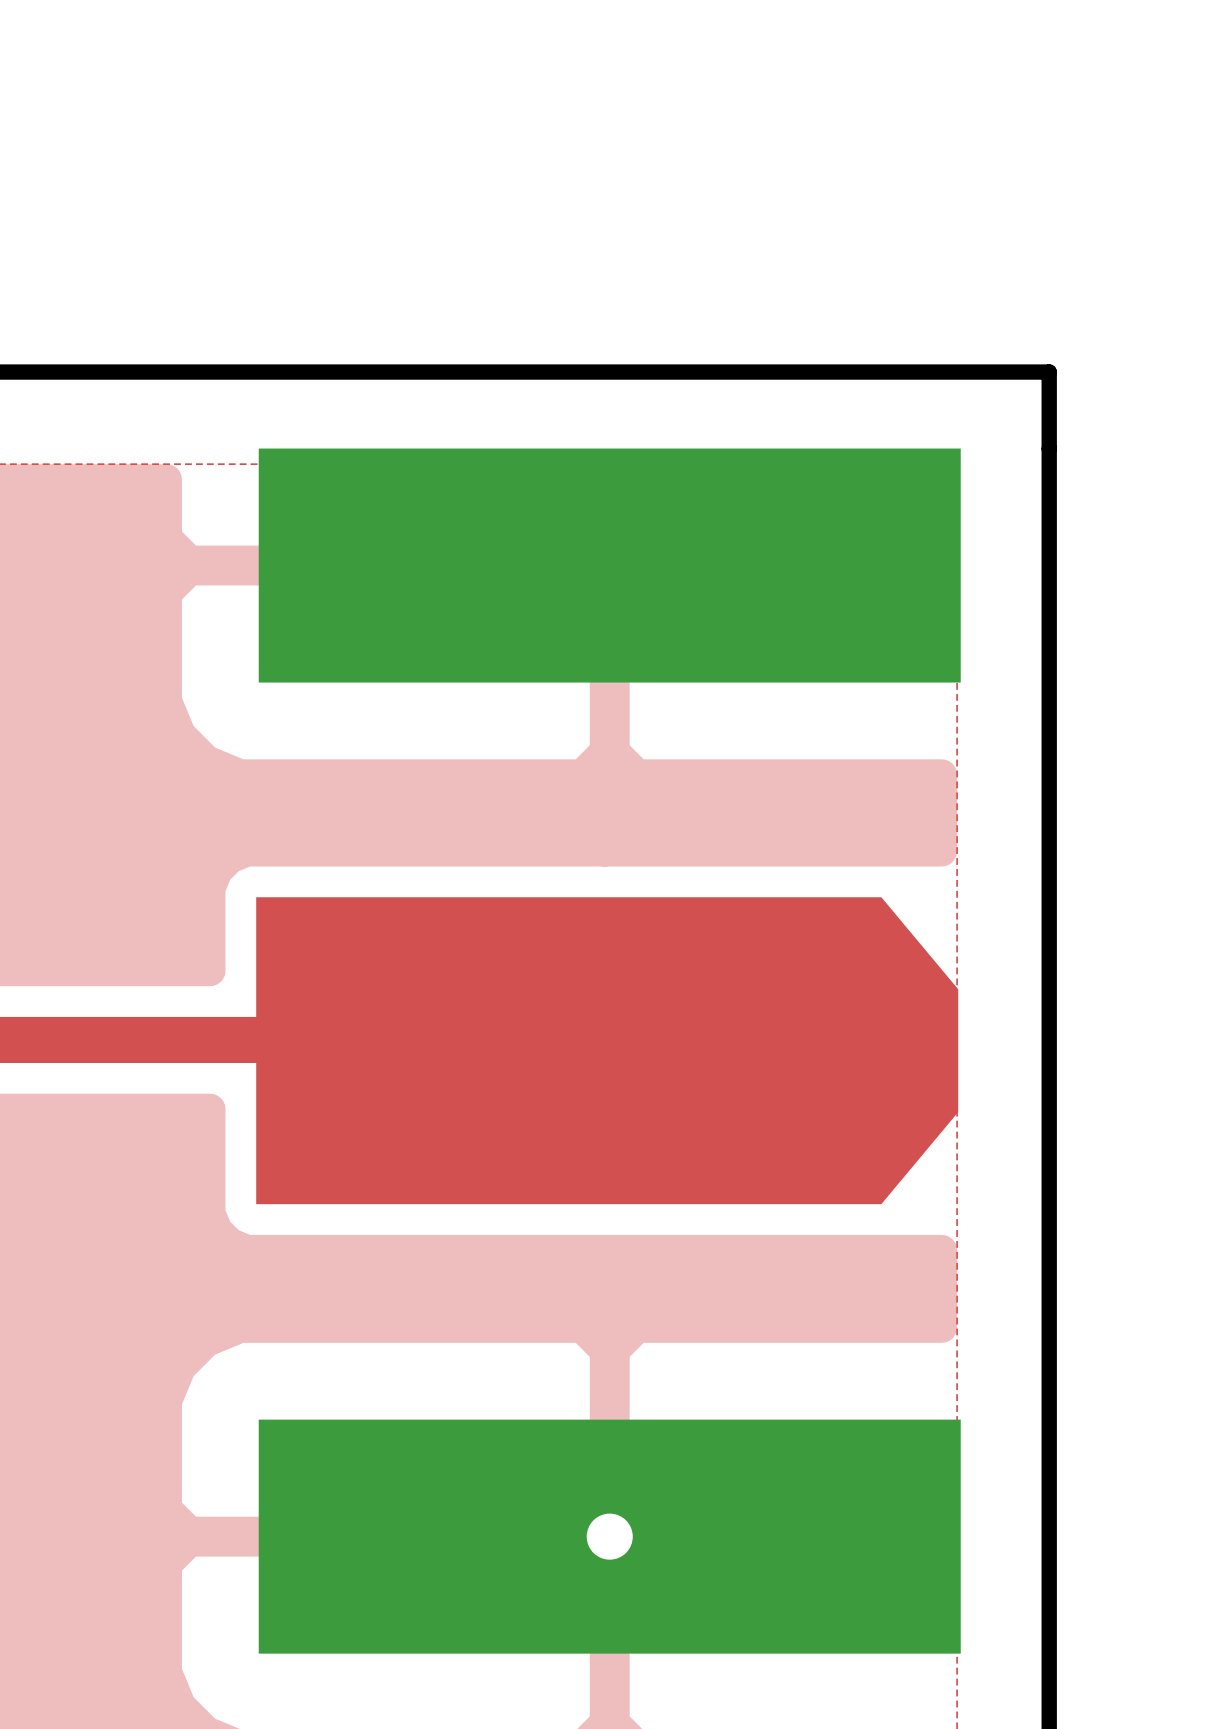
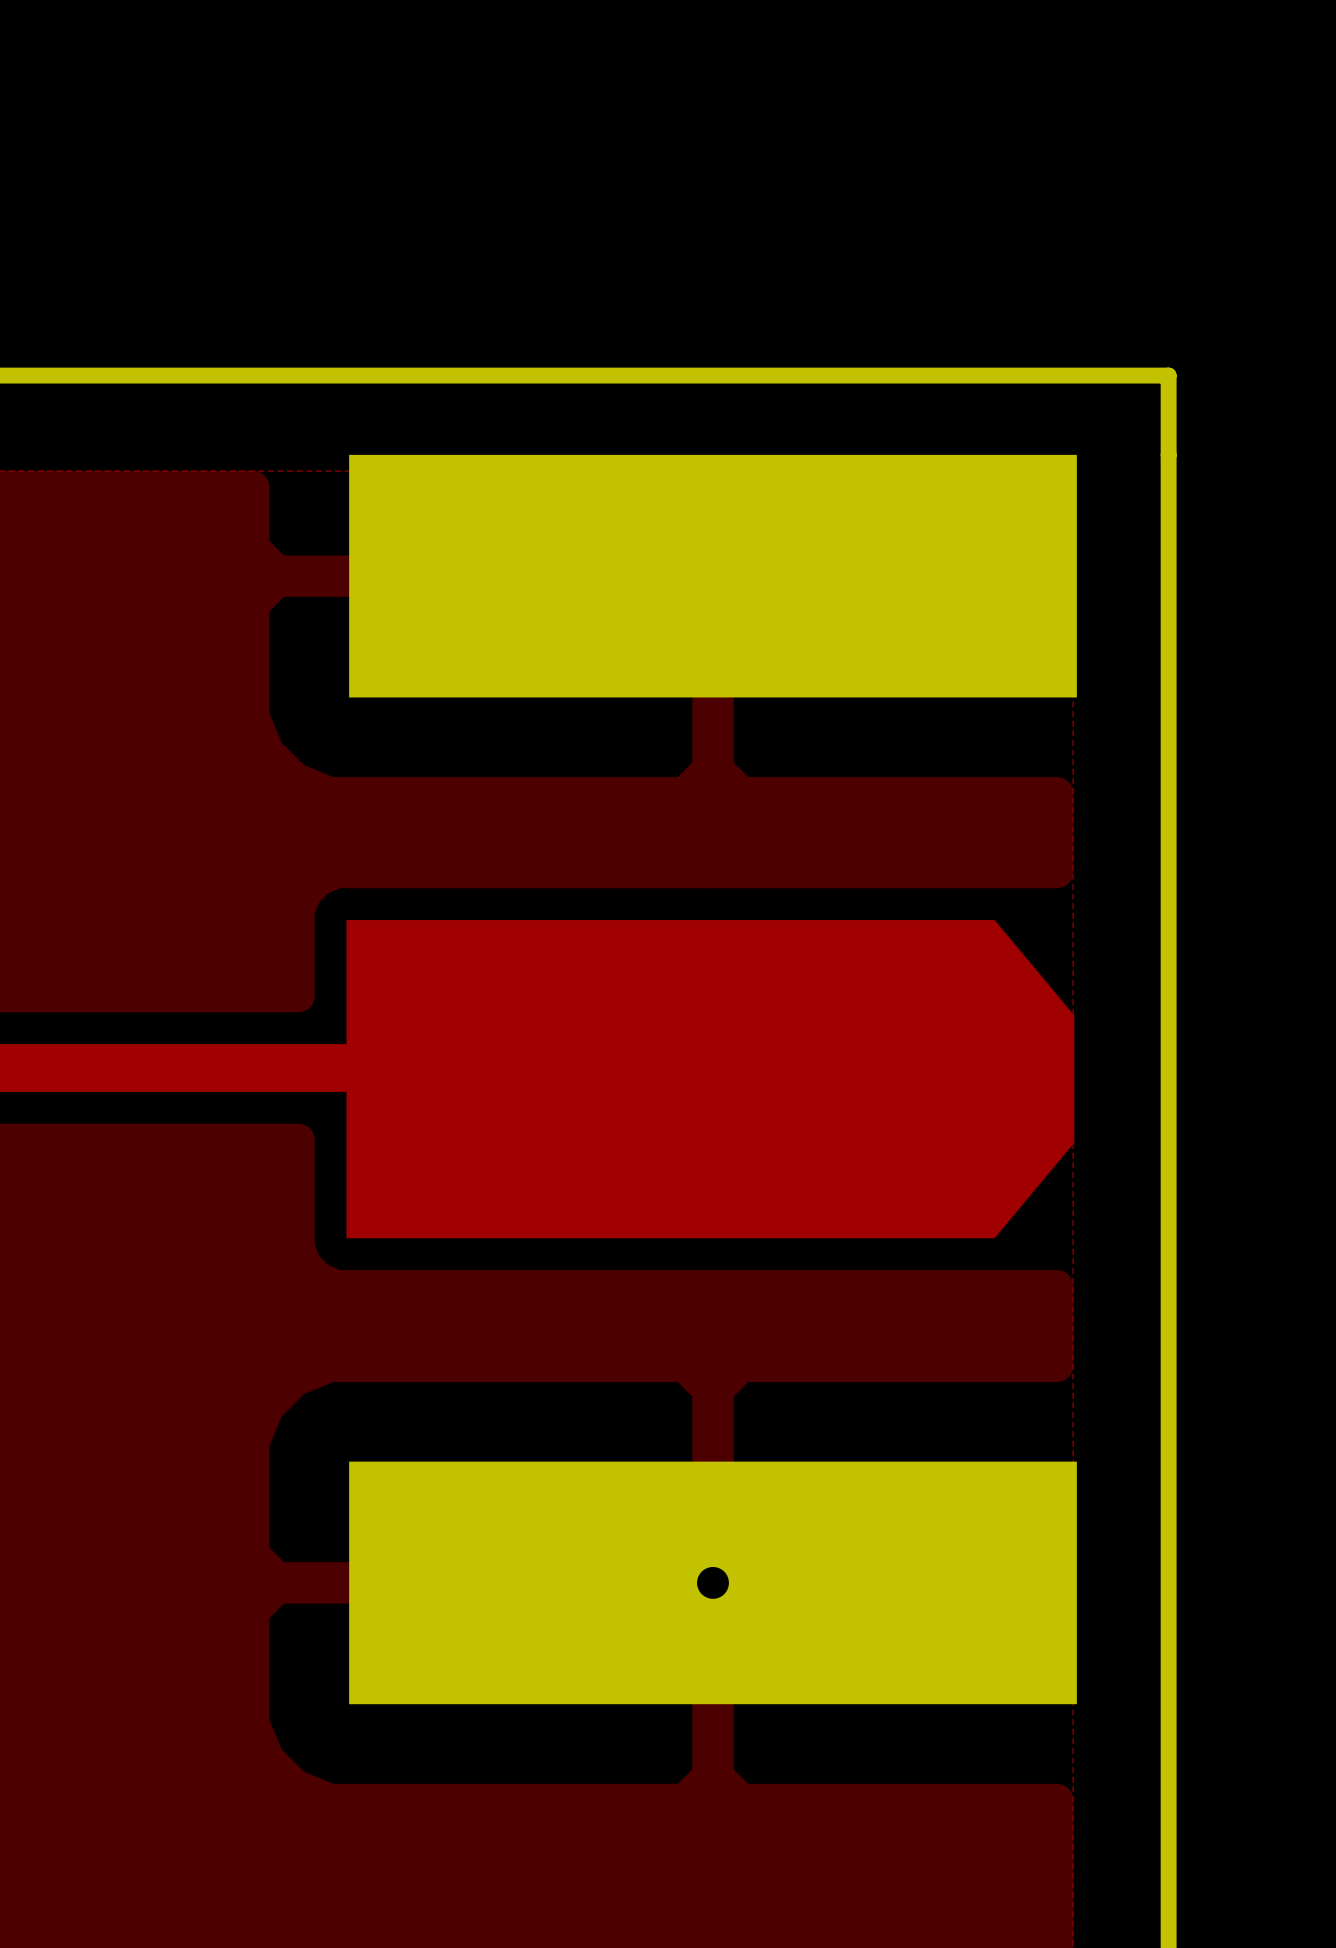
part footprint: [256, 448, 961, 1654] -> [346, 454, 1077, 1705]

